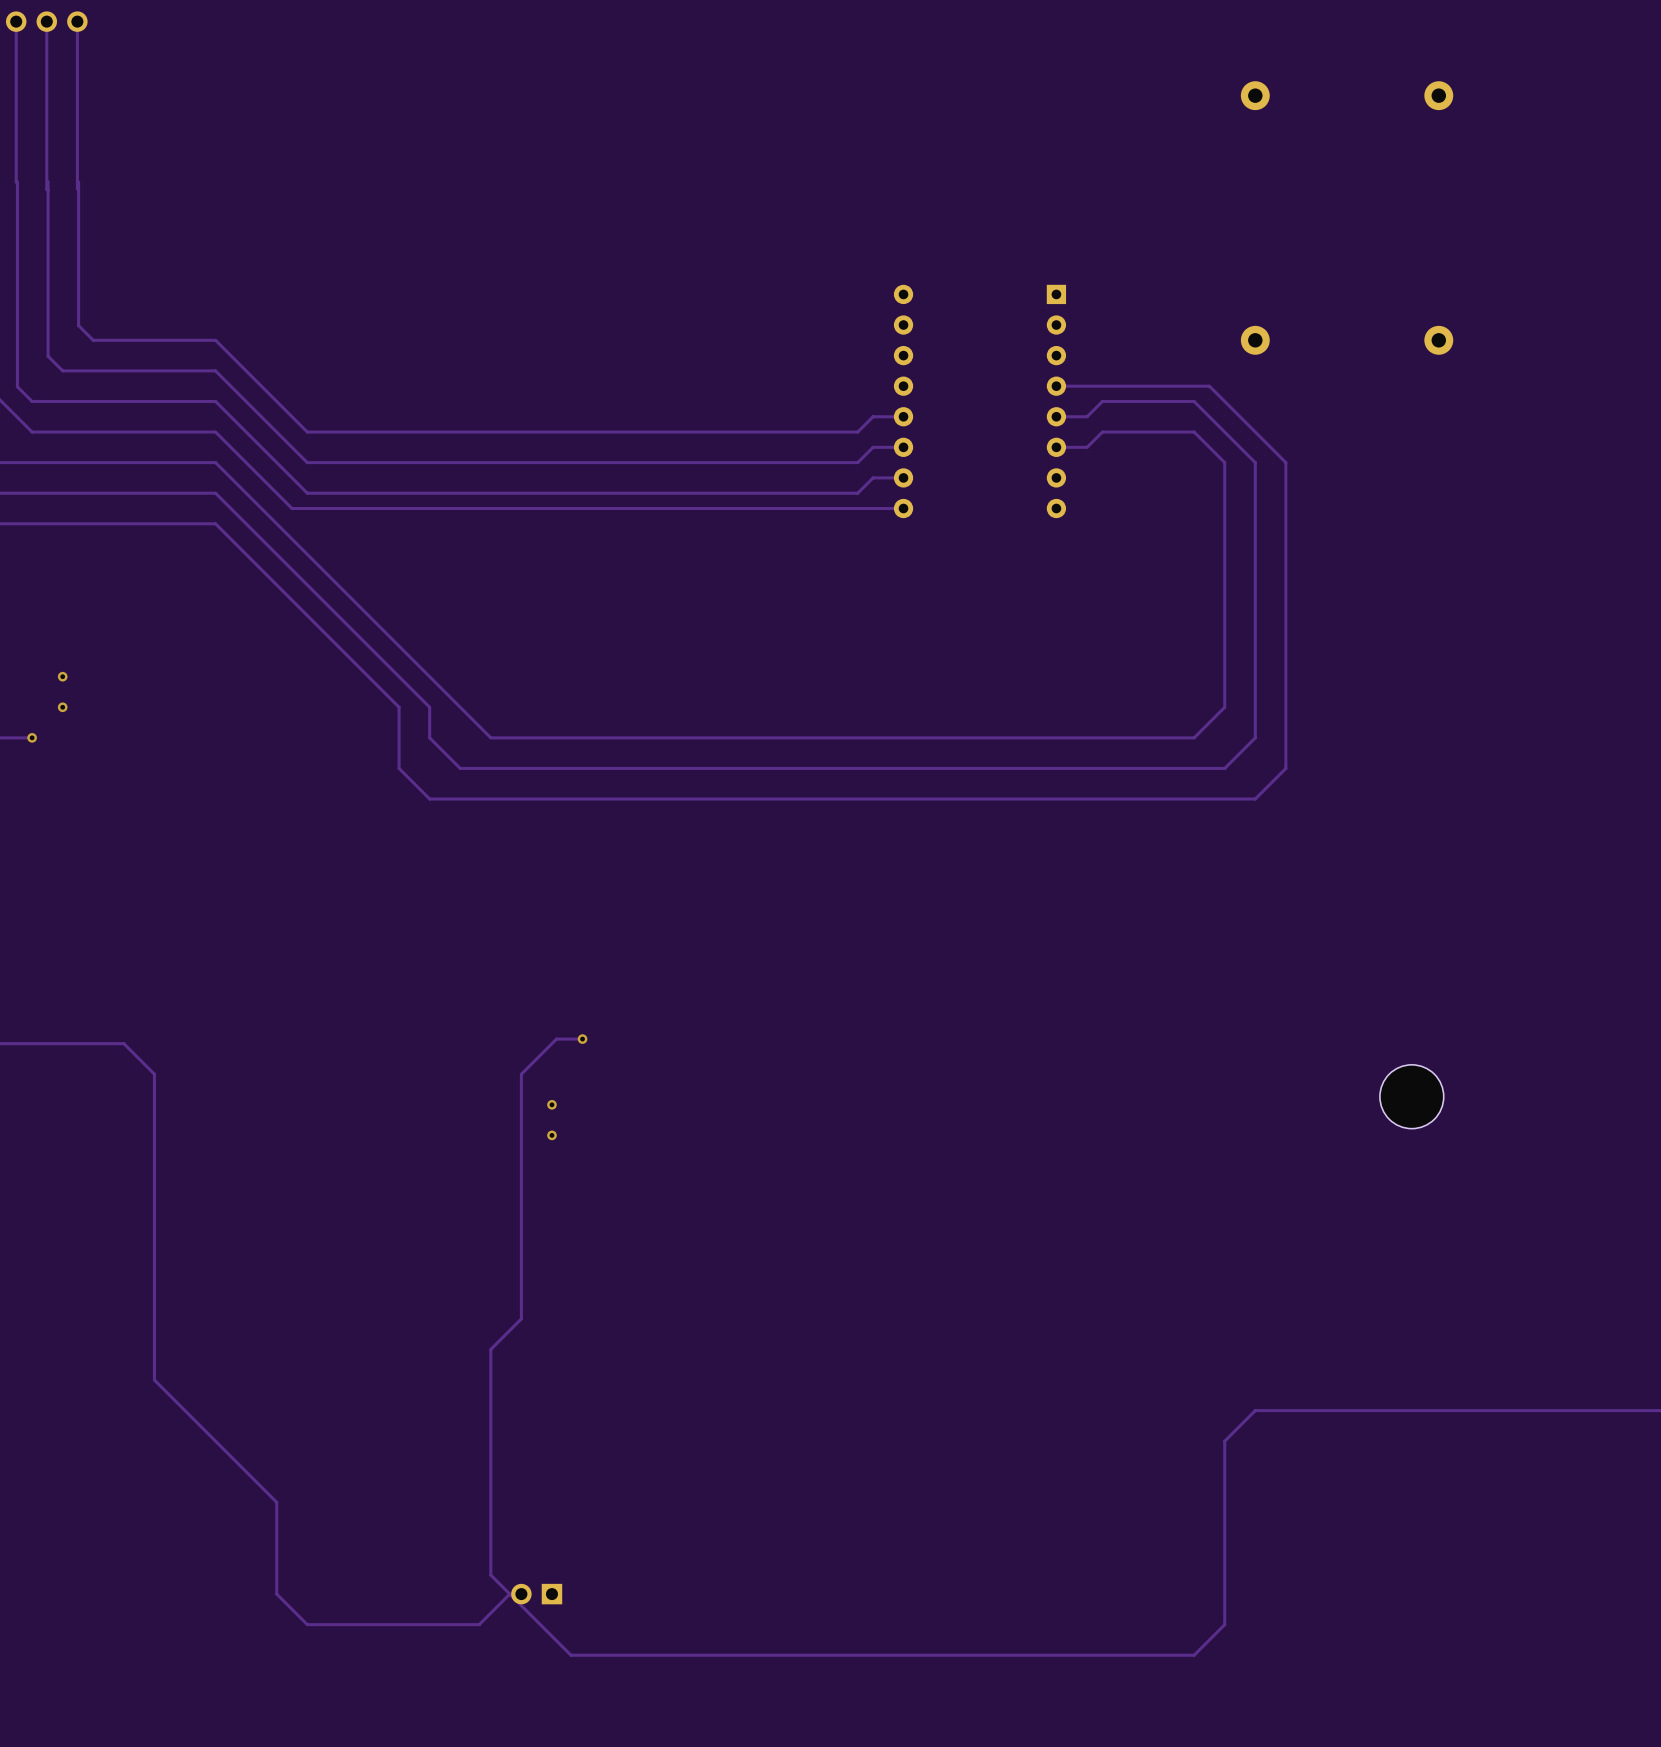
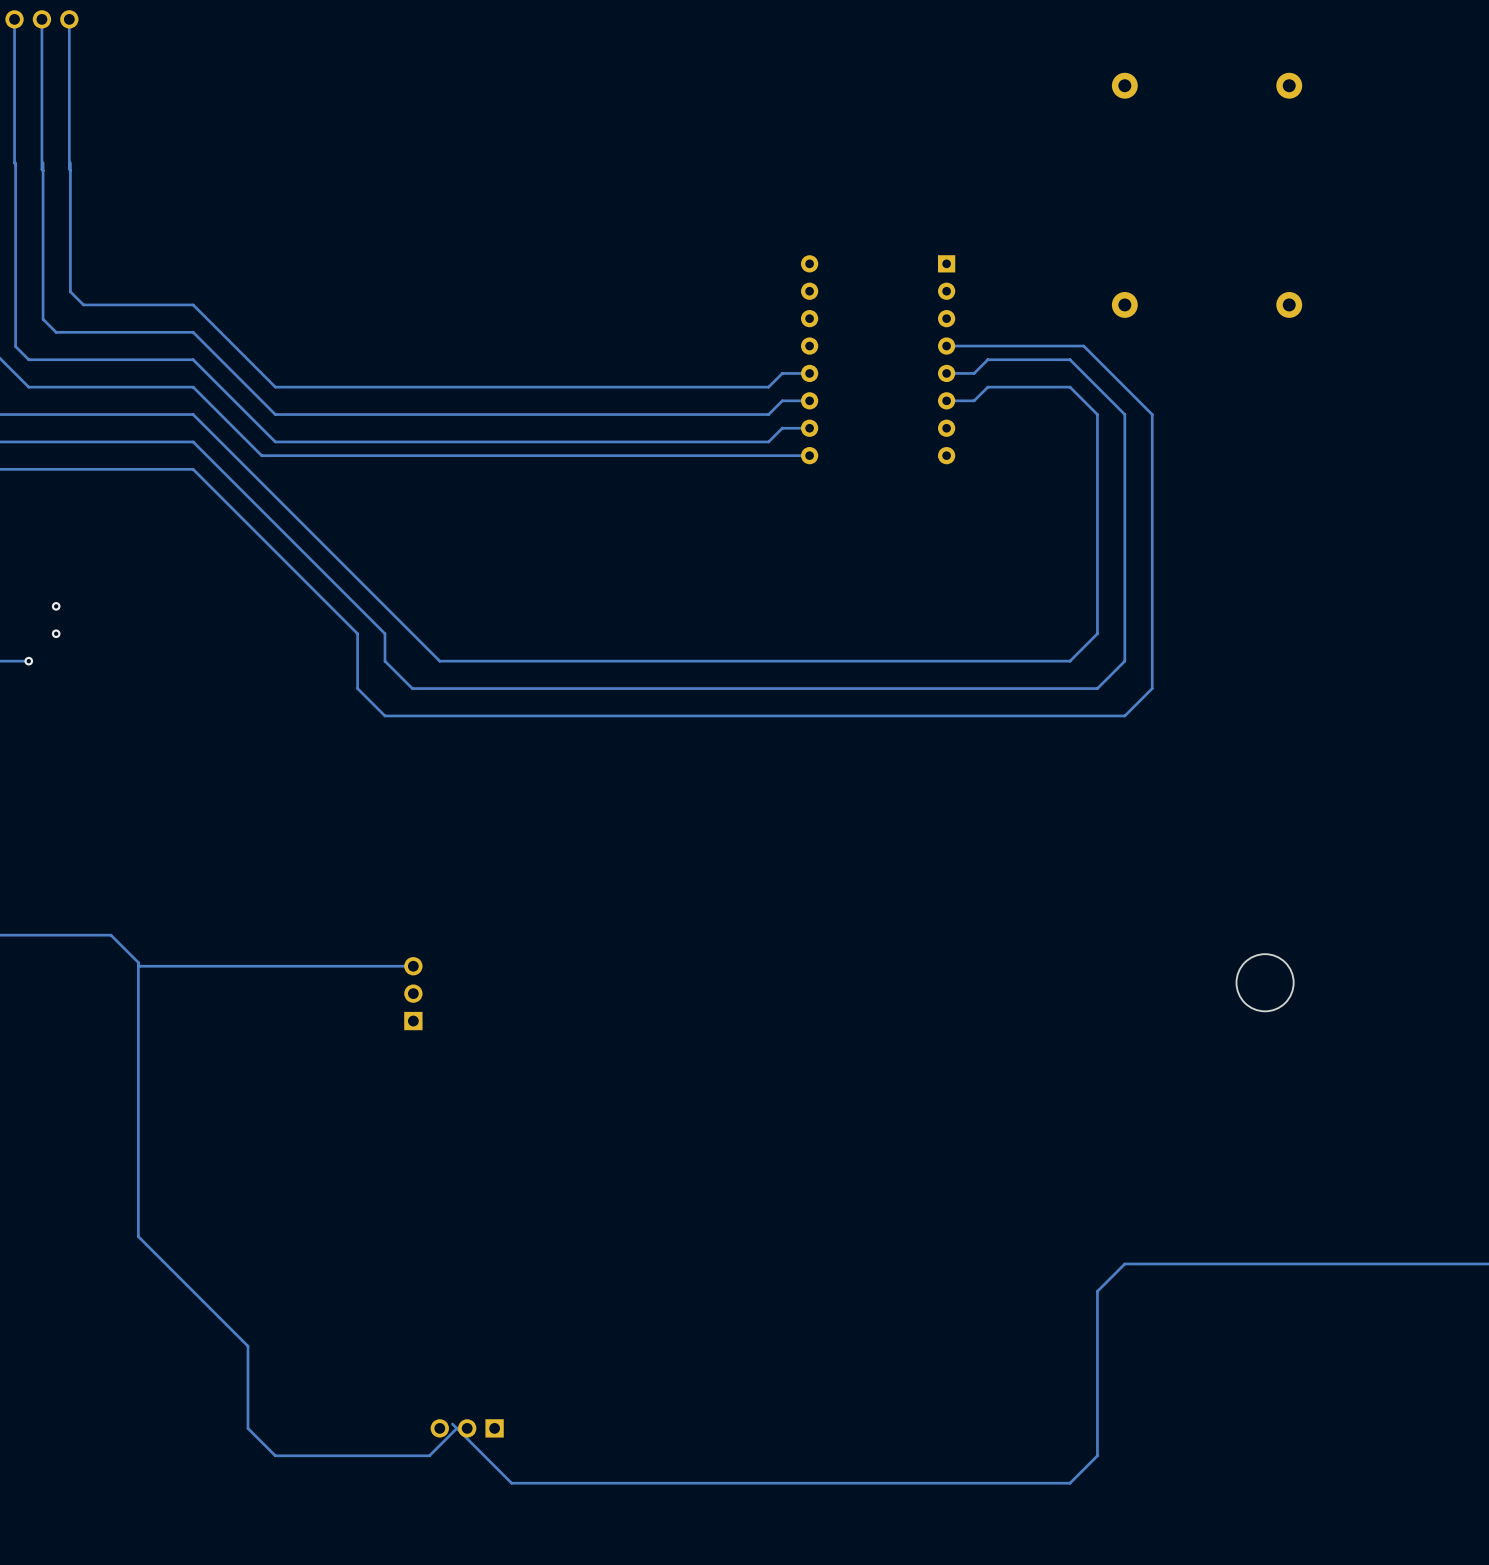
track: (582, 1039) (556, 1039) (521, 1074) (521, 1318) (490, 1349) (490, 1575) (504, 1589) -> none
via: (582, 1039) -> none
track: none -> (138, 964) (413, 966)
via: (551, 1104) -> none
part: none -> (413, 993)
via: (551, 1135) -> none
part: none -> (467, 1428)

